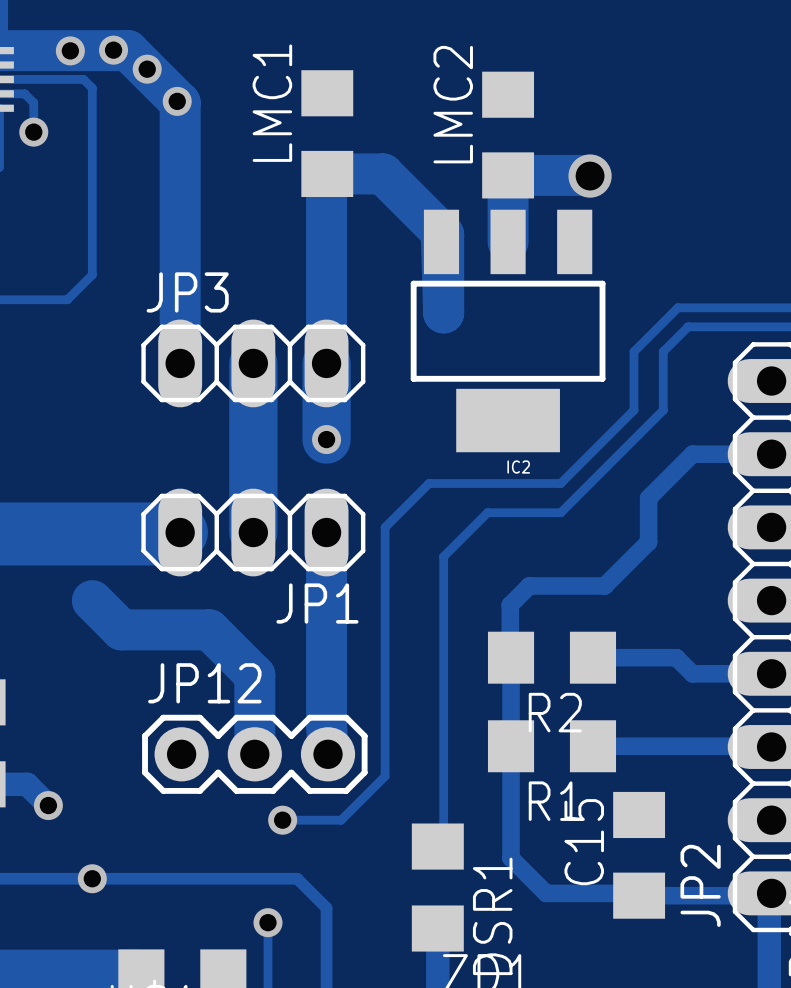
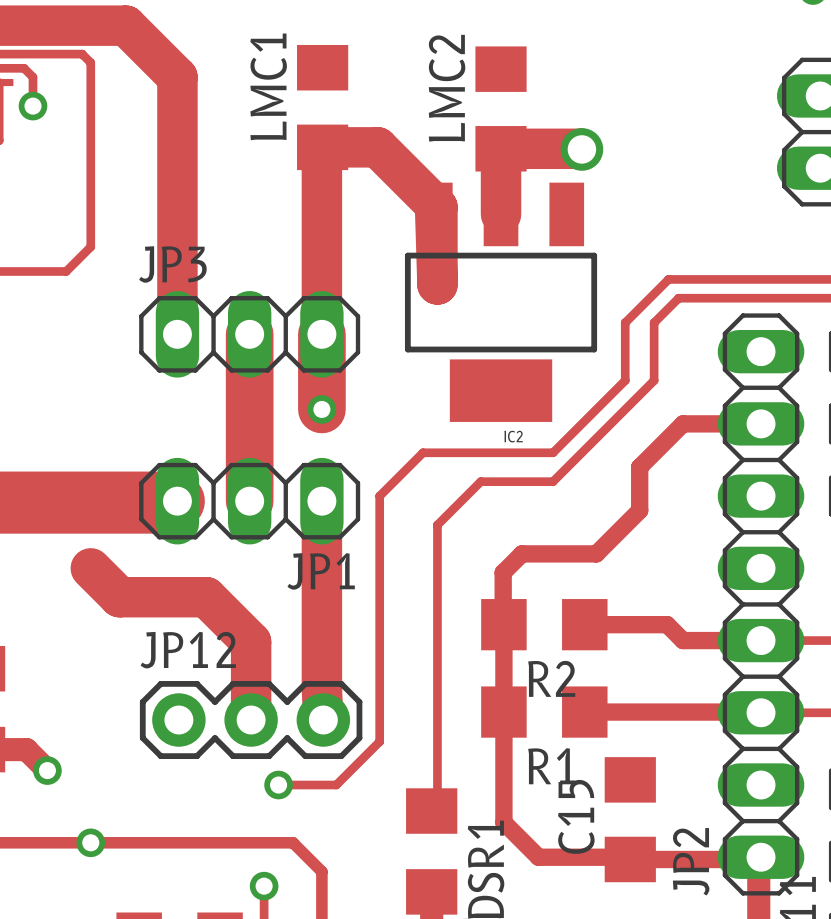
via: (70, 50) -> none
via: (113, 50) -> none
via: (147, 69) -> none
via: (177, 101) -> none

